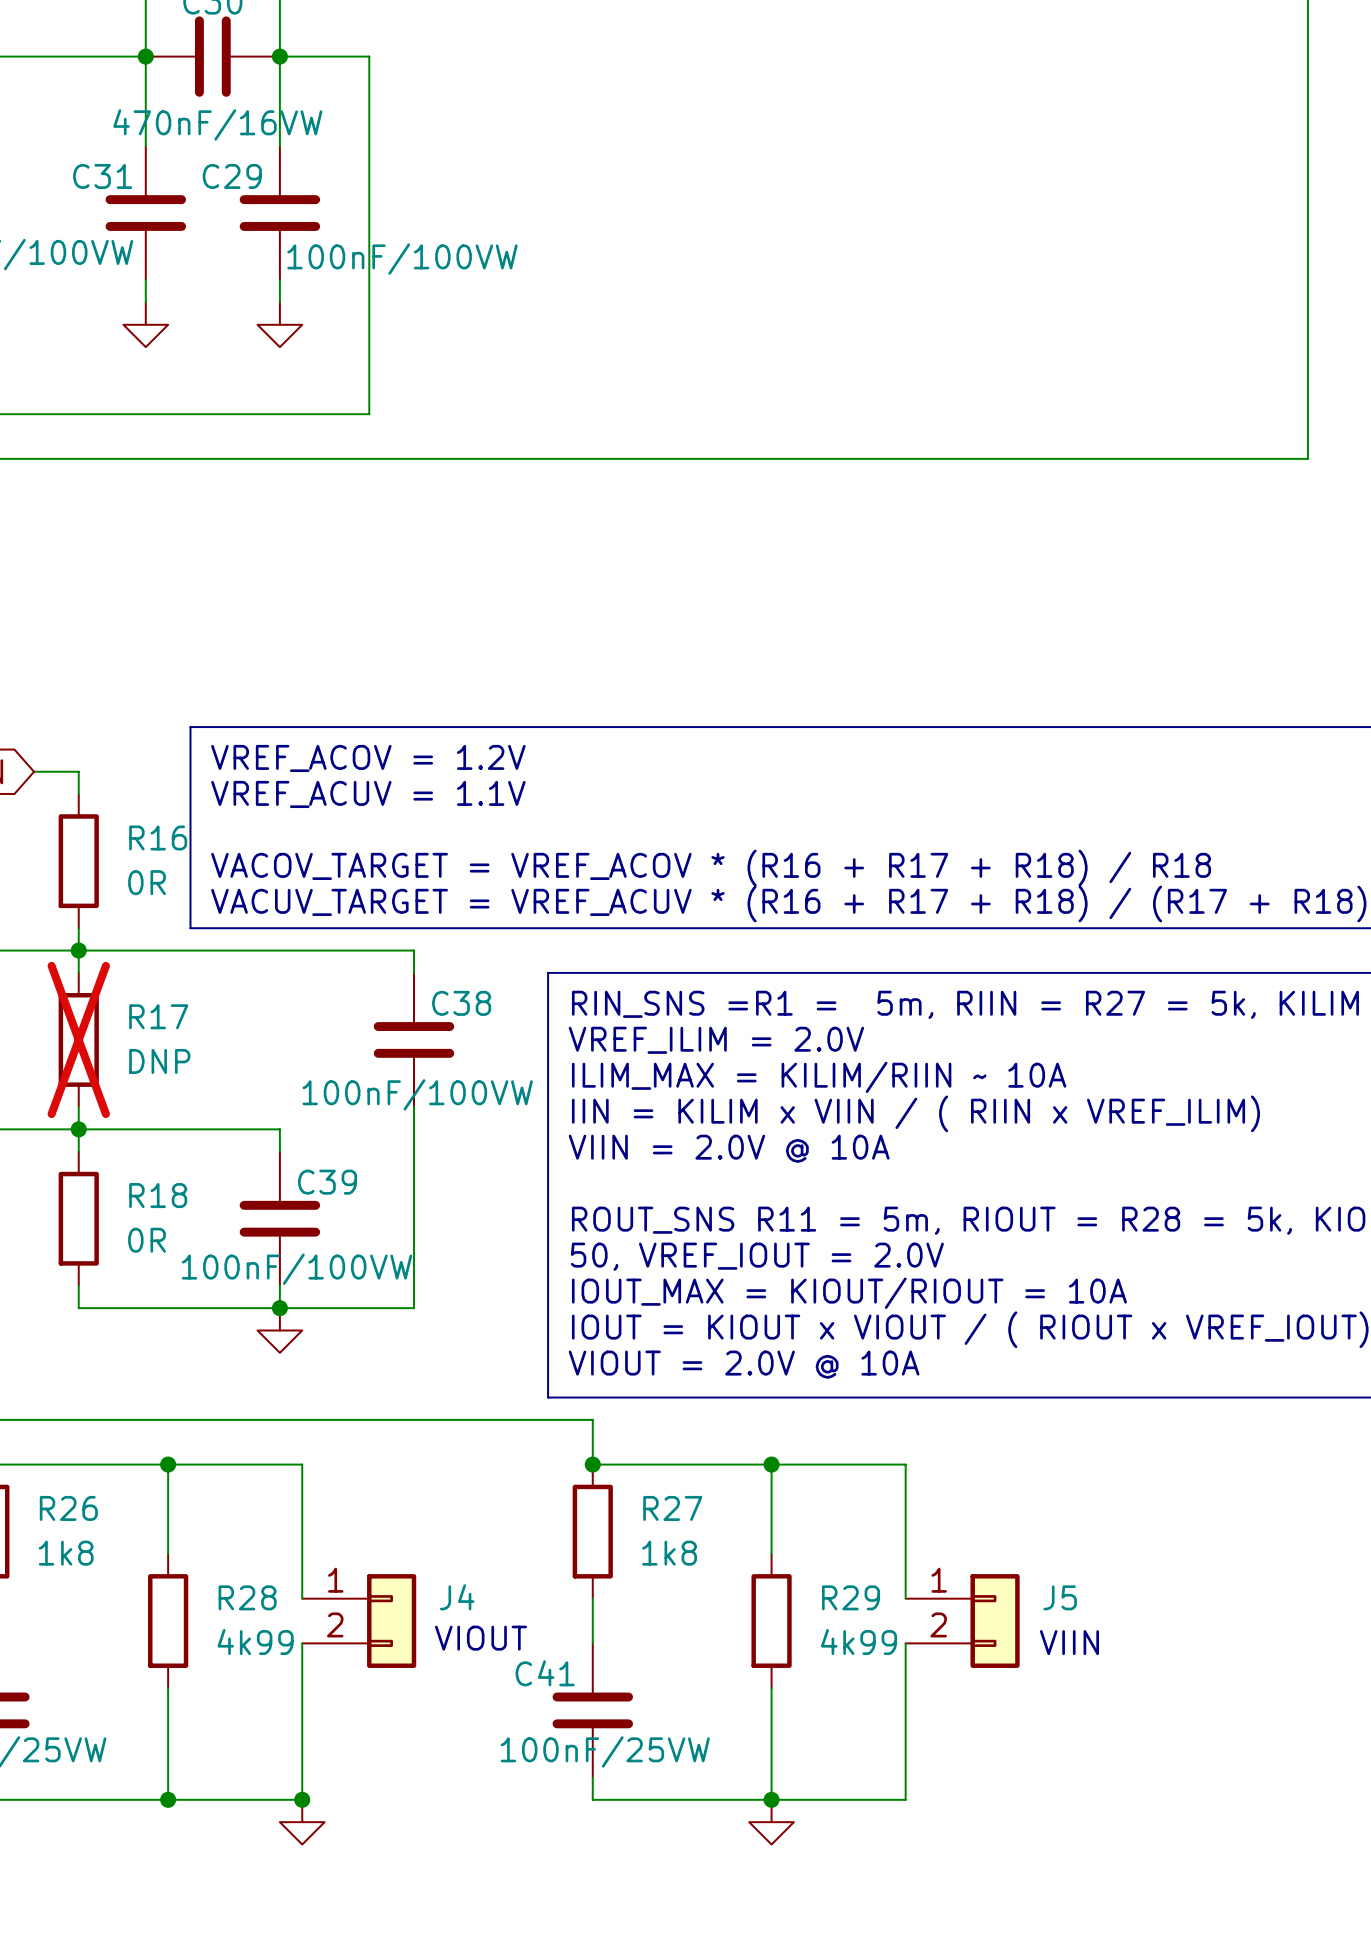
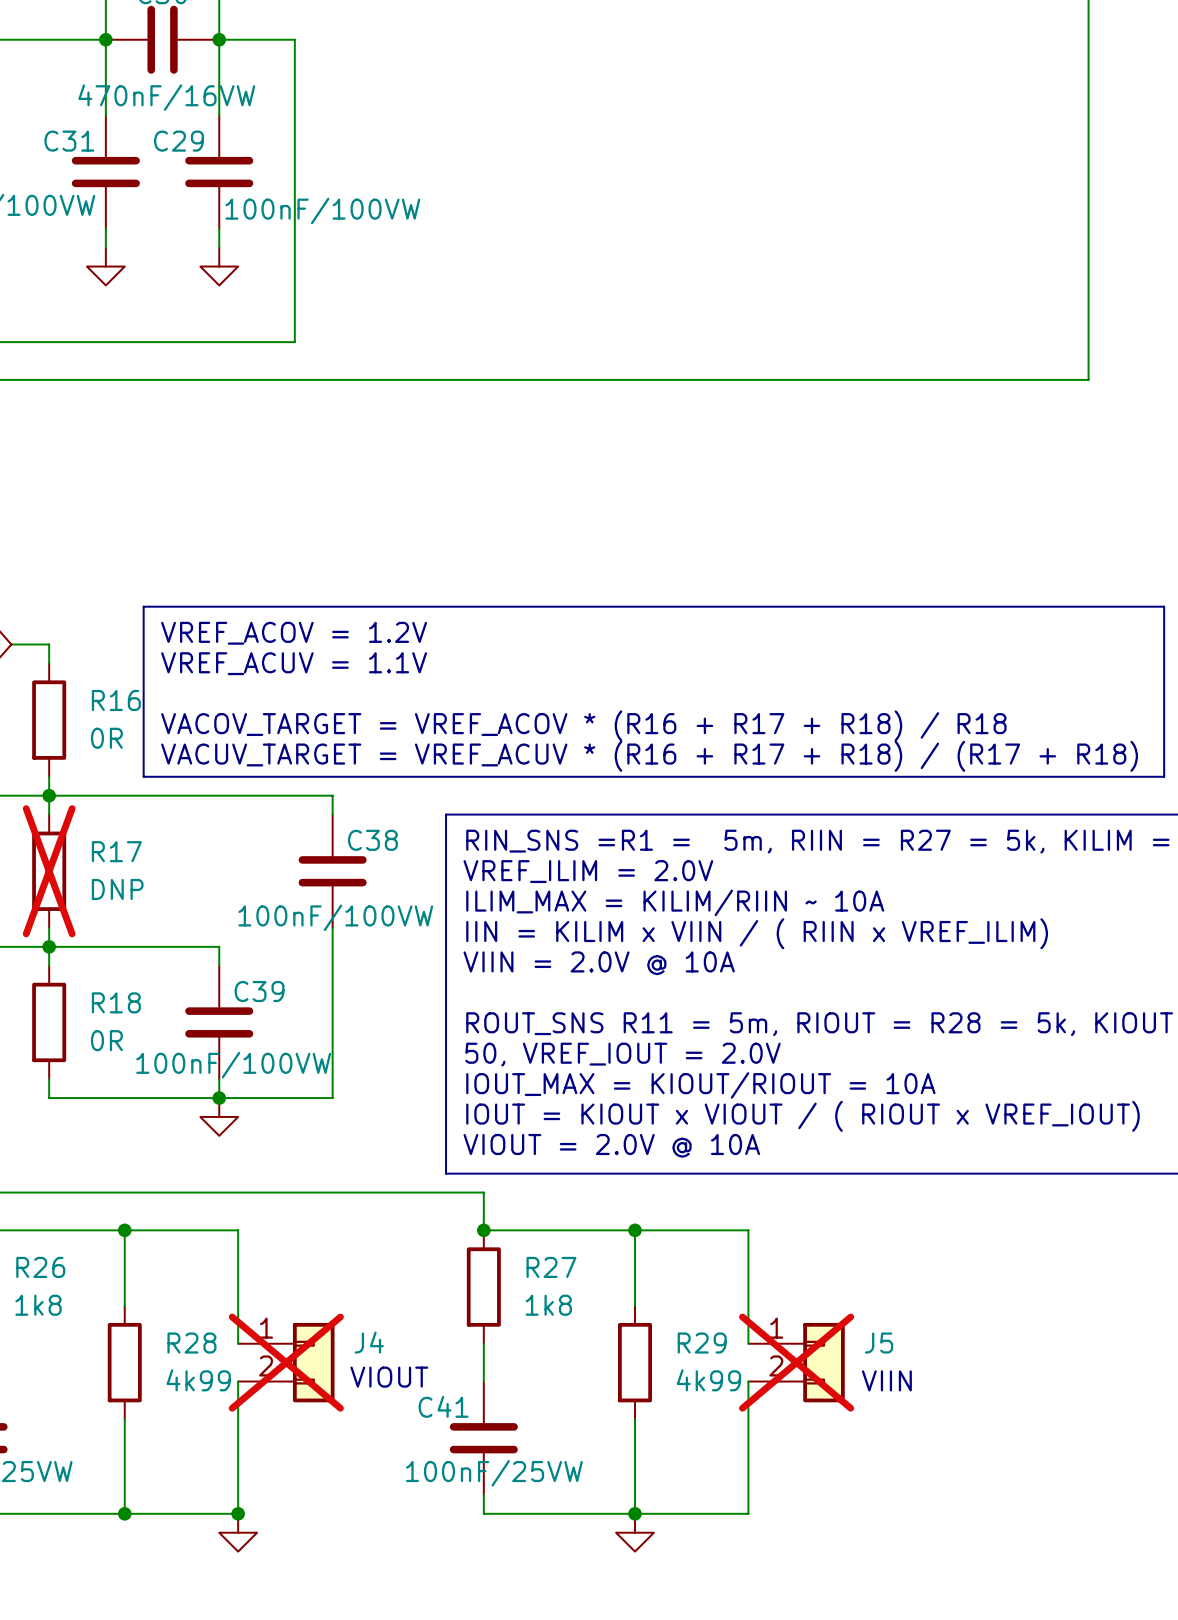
J4 do-not-place cross: none -> (286, 1362)
J5 do-not-place cross: none -> (796, 1362)

